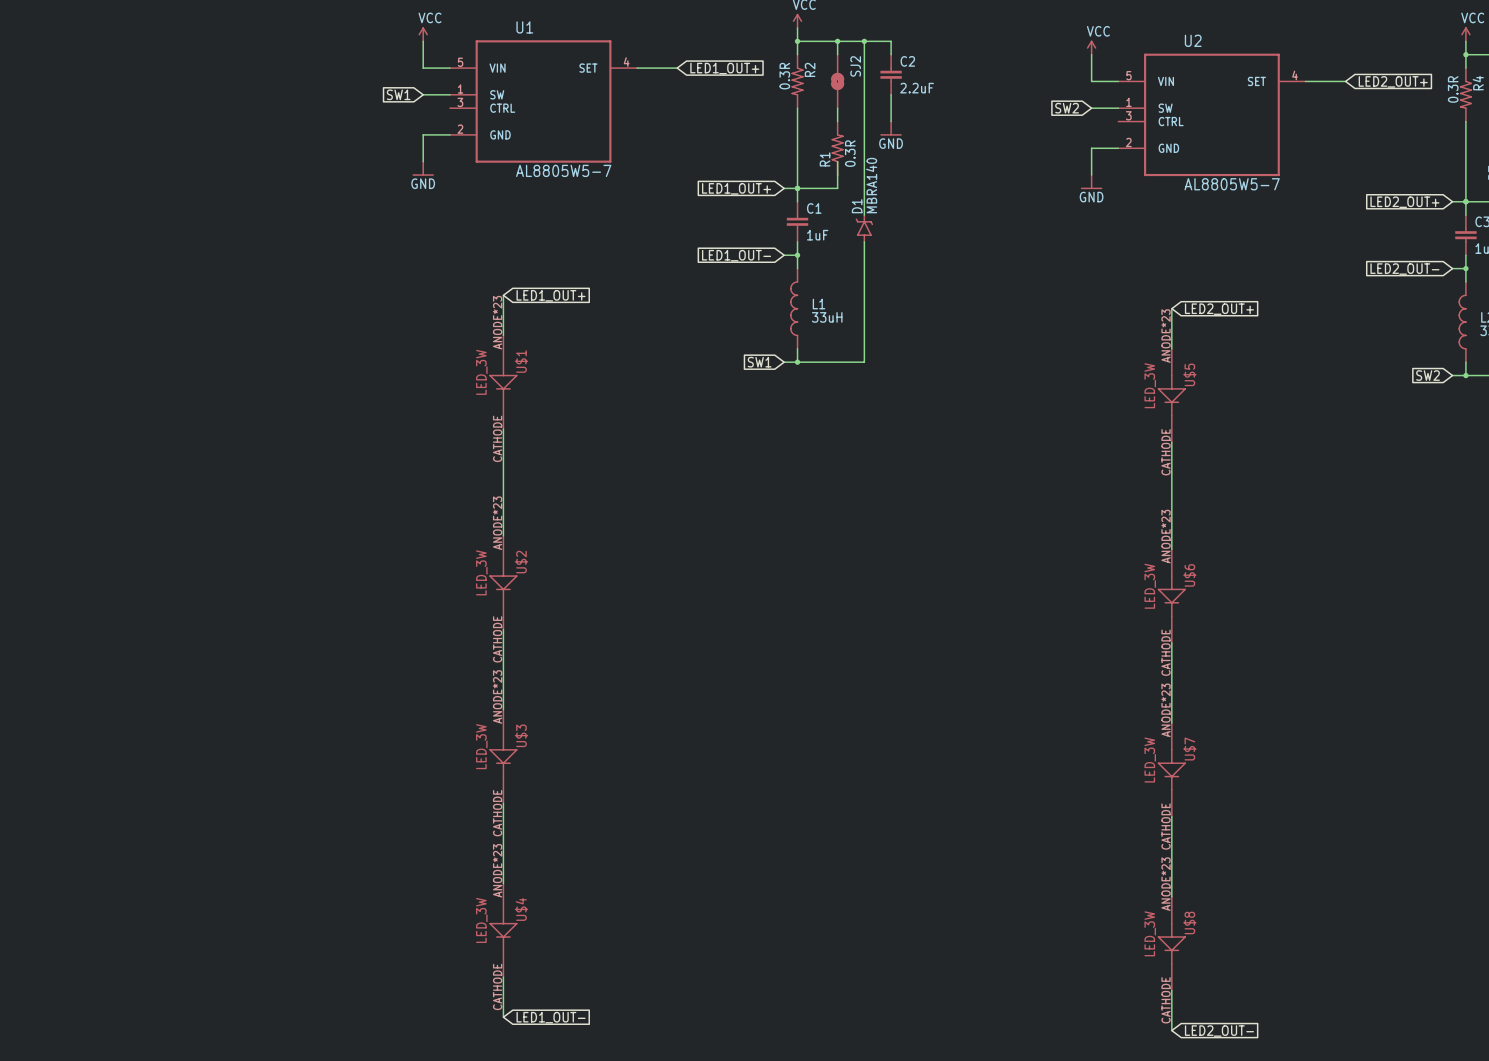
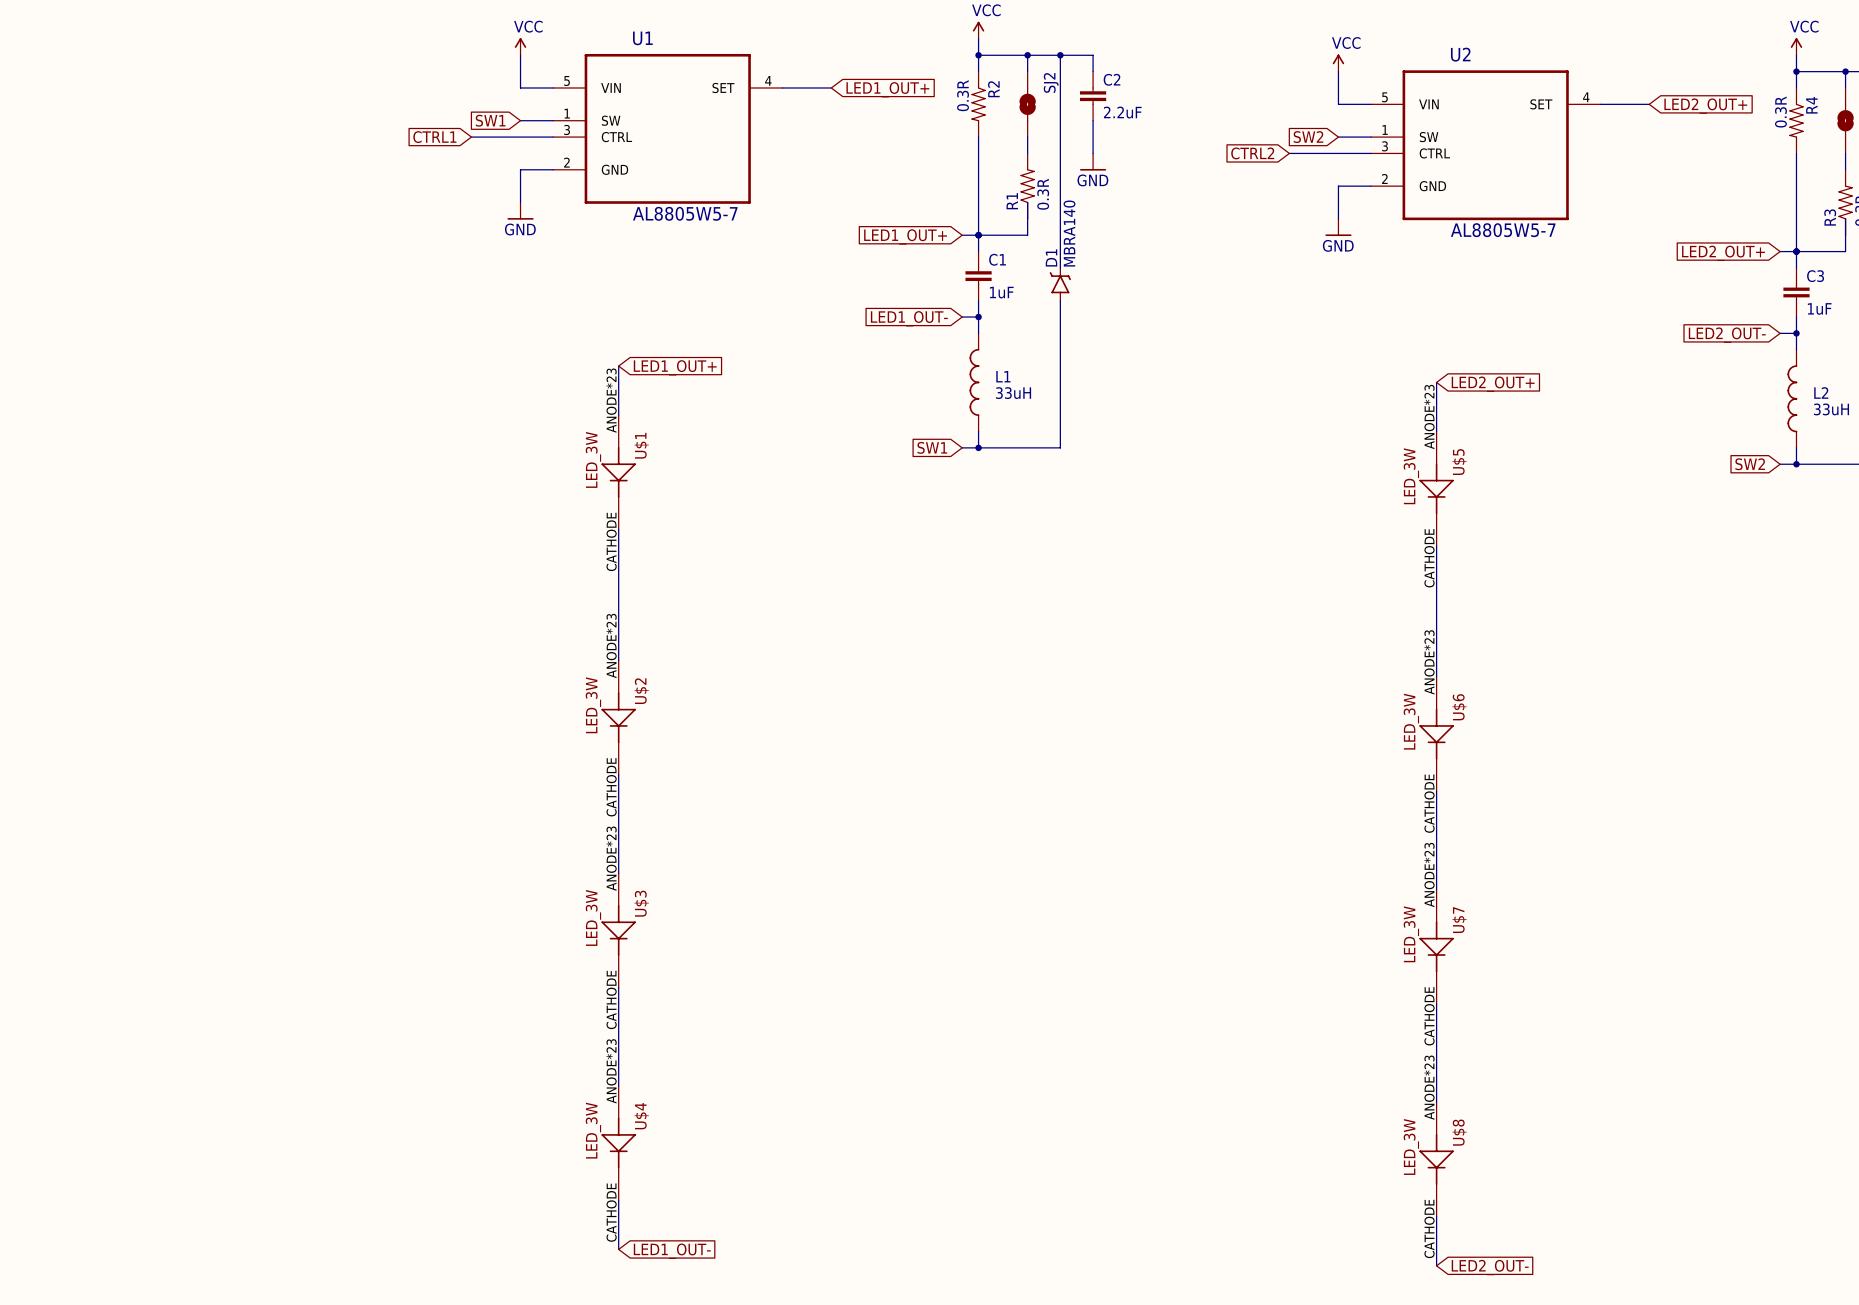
global label: none -> CTRL1 (434, 137)
wire: none -> (471, 137) (553, 137)
global label: none -> CTRL2 (1252, 153)
wire: none -> (1289, 153) (1371, 153)

